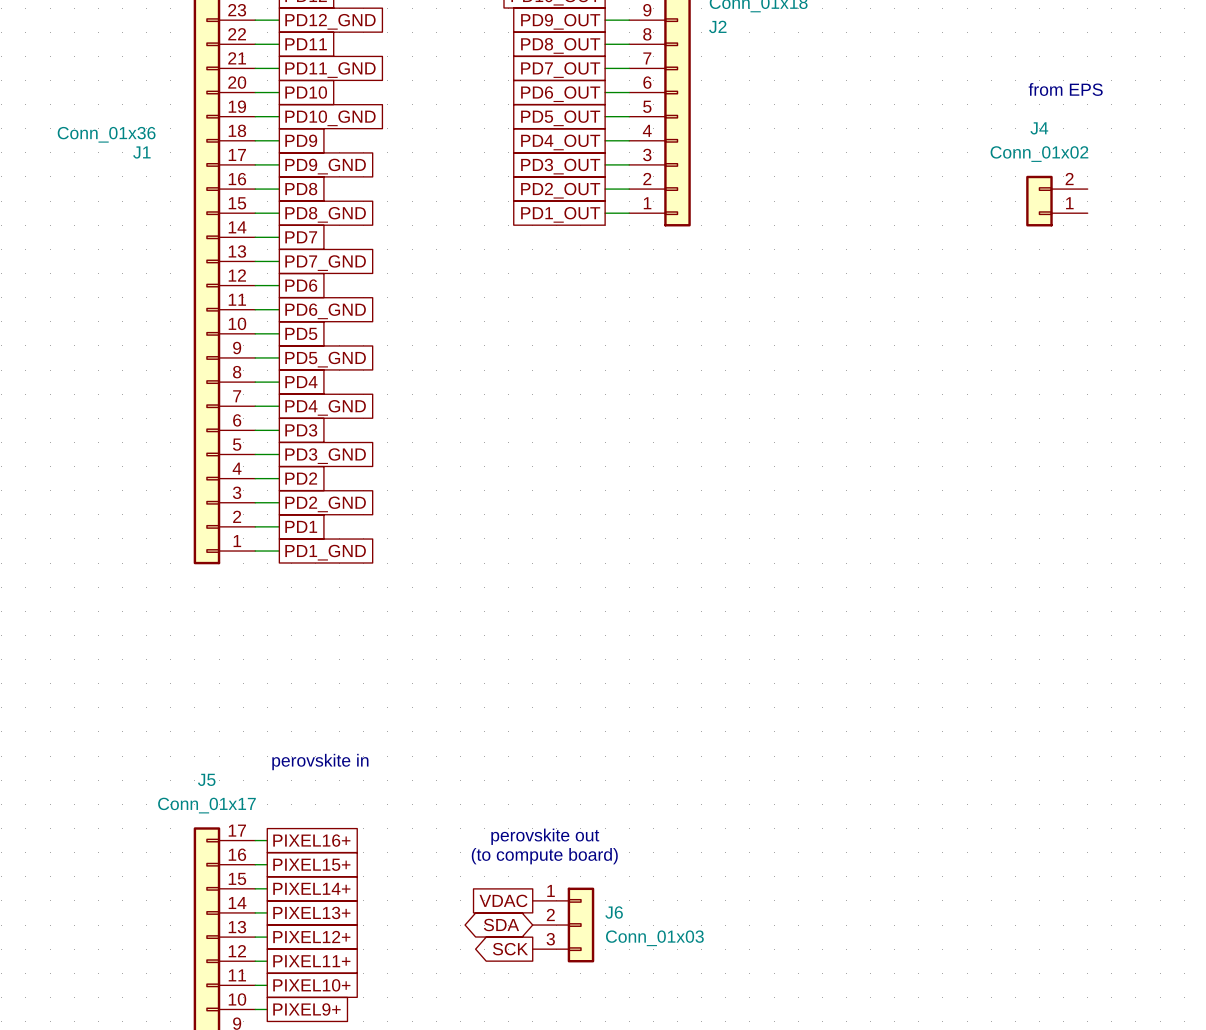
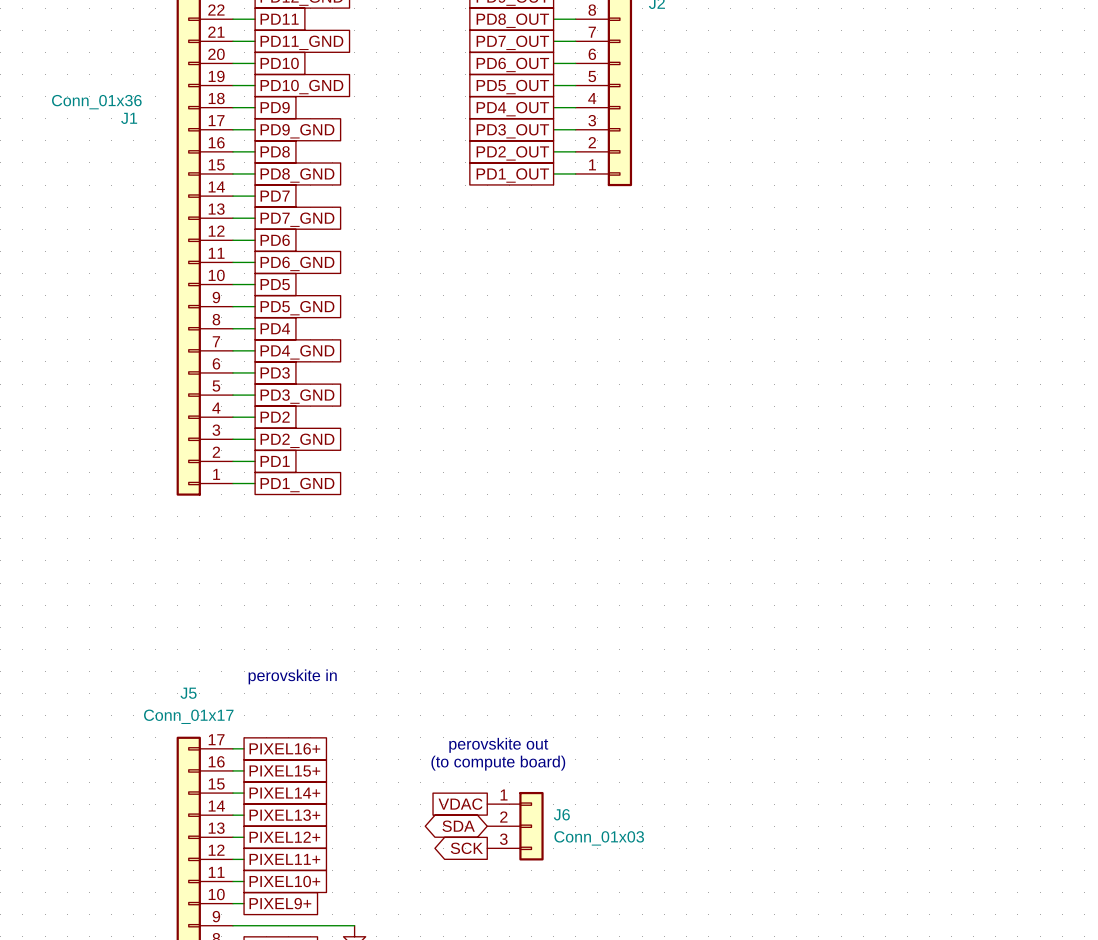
text: from EPS (1065, 89) -> none
J4: Conn_01x02 (1056, 201) -> none

